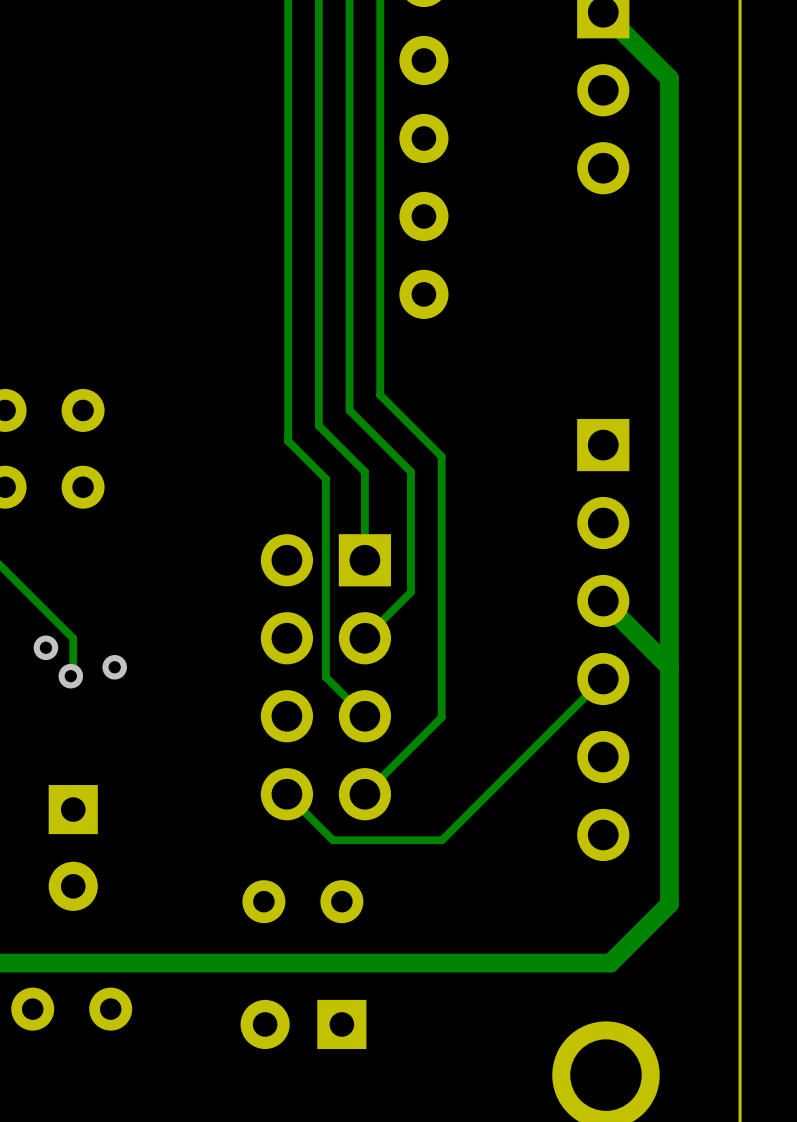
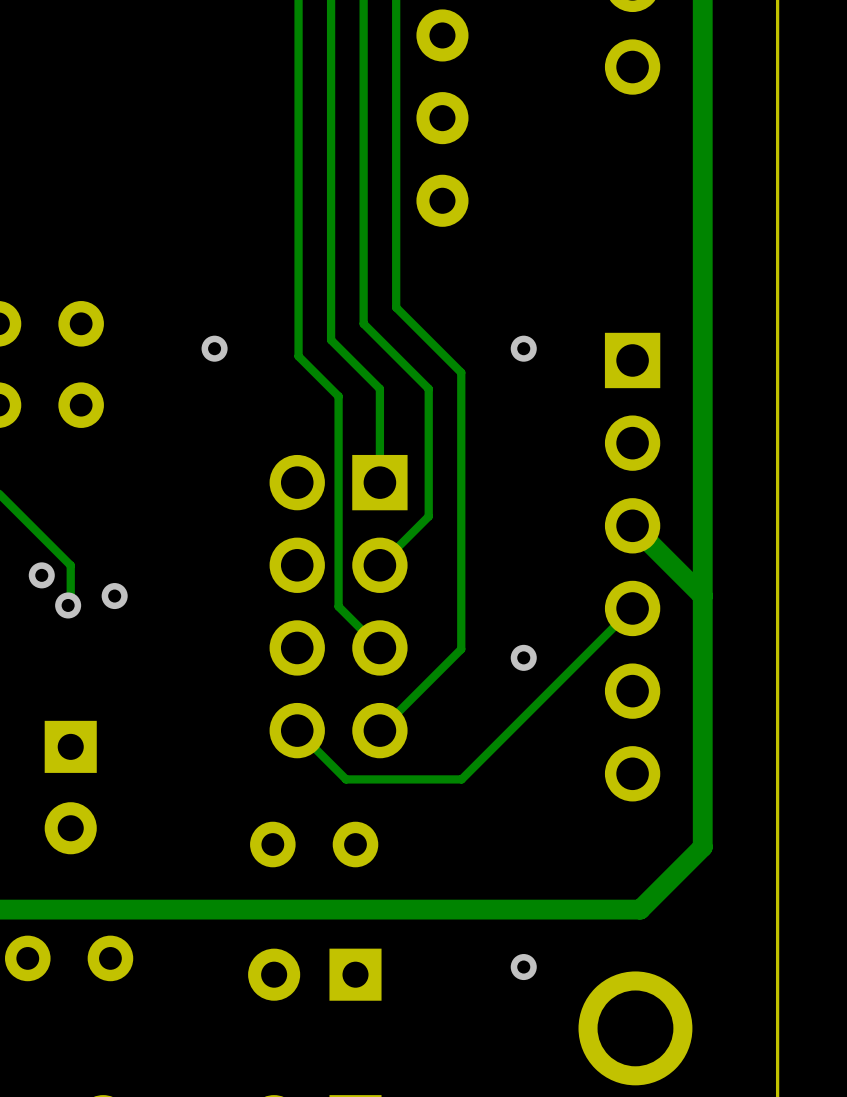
via: none -> (214, 348)
via: none -> (523, 348)
via: none -> (523, 657)
via: none -> (523, 967)

